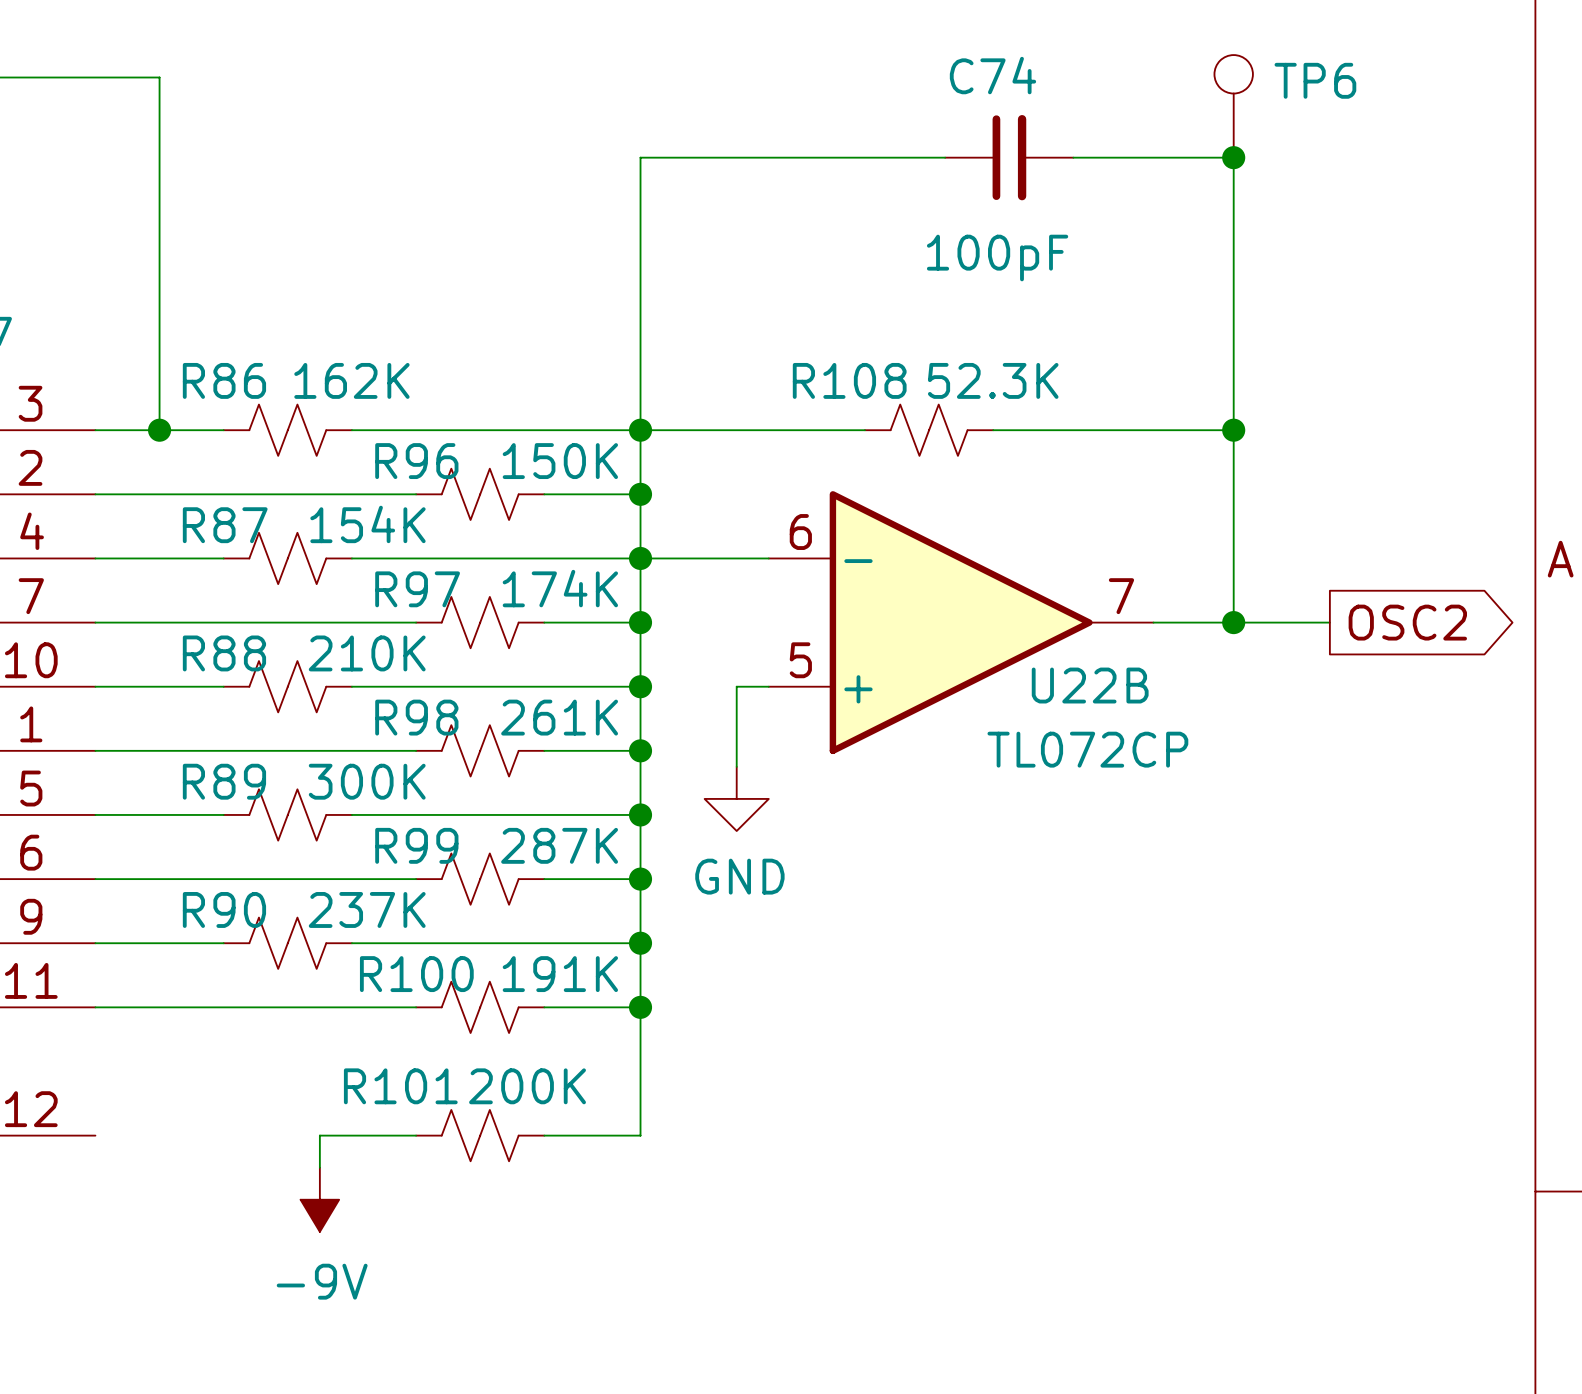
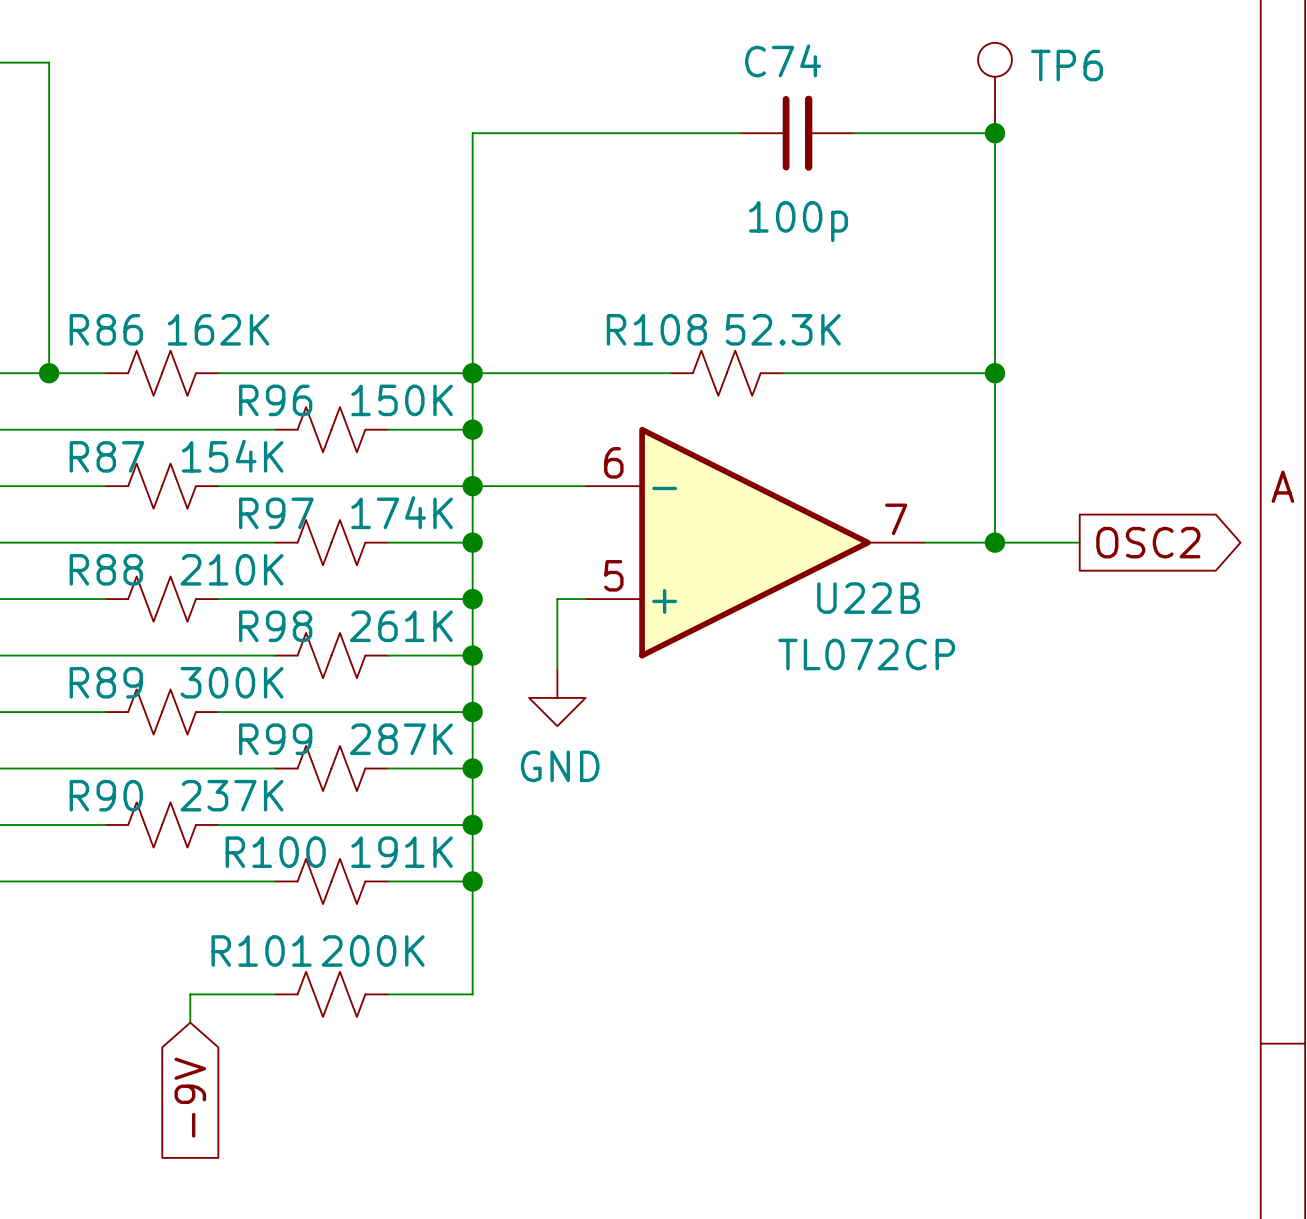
C74 value: 100pF (997, 258) -> 100p (798, 221)
power symbol: -9V (319, 1199) -> none
global label: none -> -9V (190, 1097)

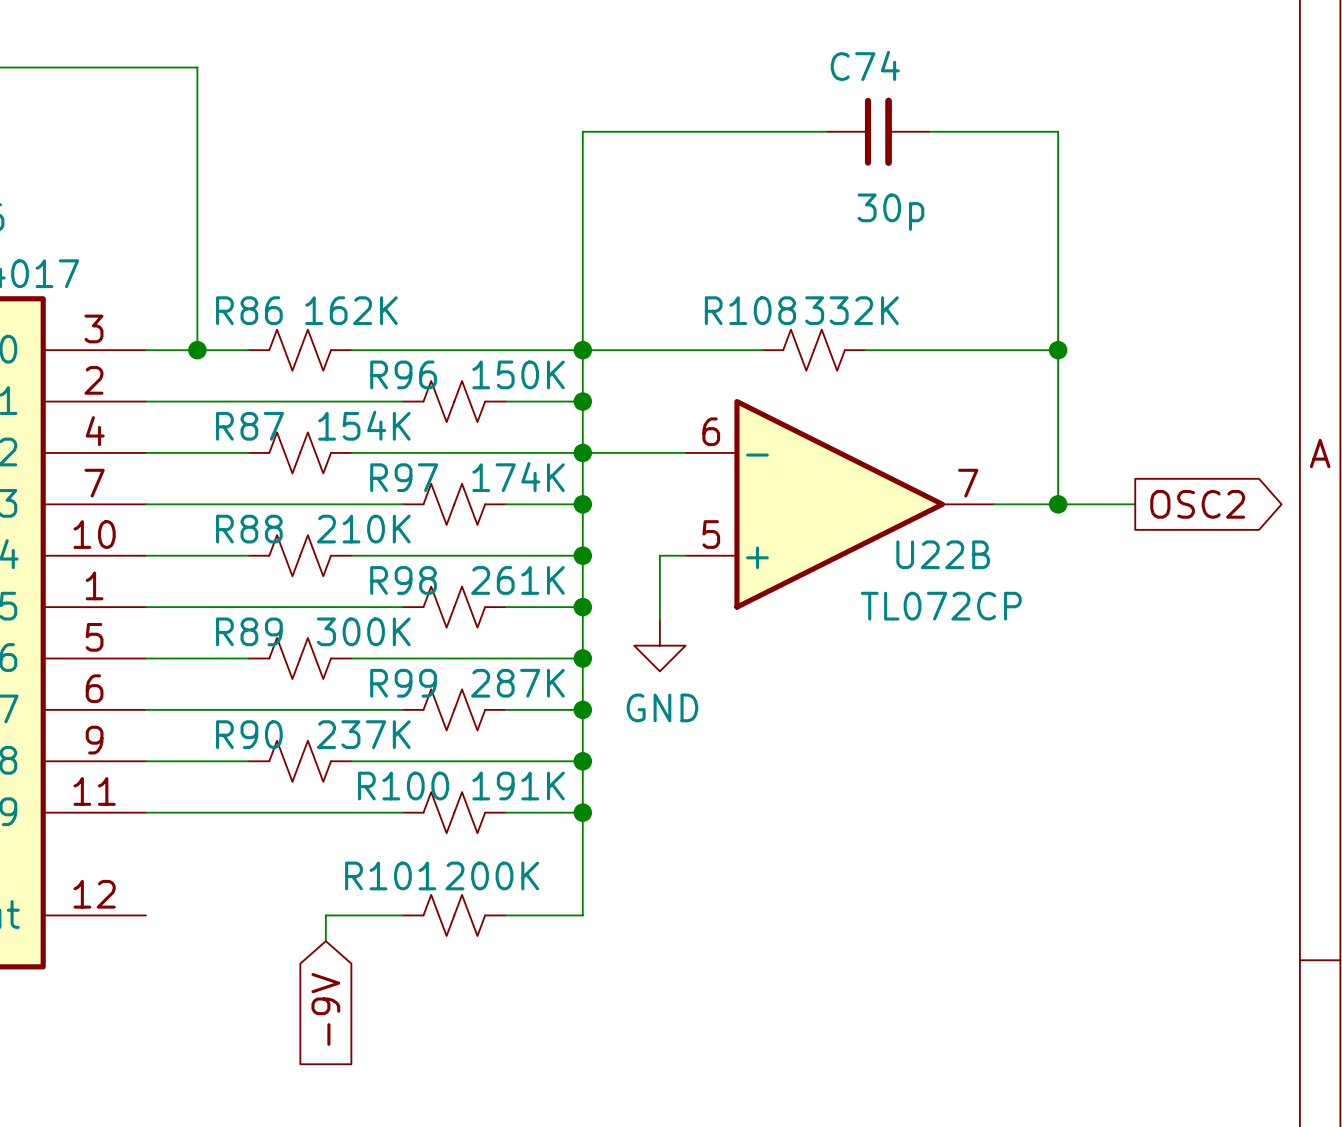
TP6: (995, 88) -> none
junction: (995, 133) -> none
C74 value: 100p (798, 221) -> 30p (890, 212)
R108 value: 52.3K (783, 329) -> 332K (851, 310)

